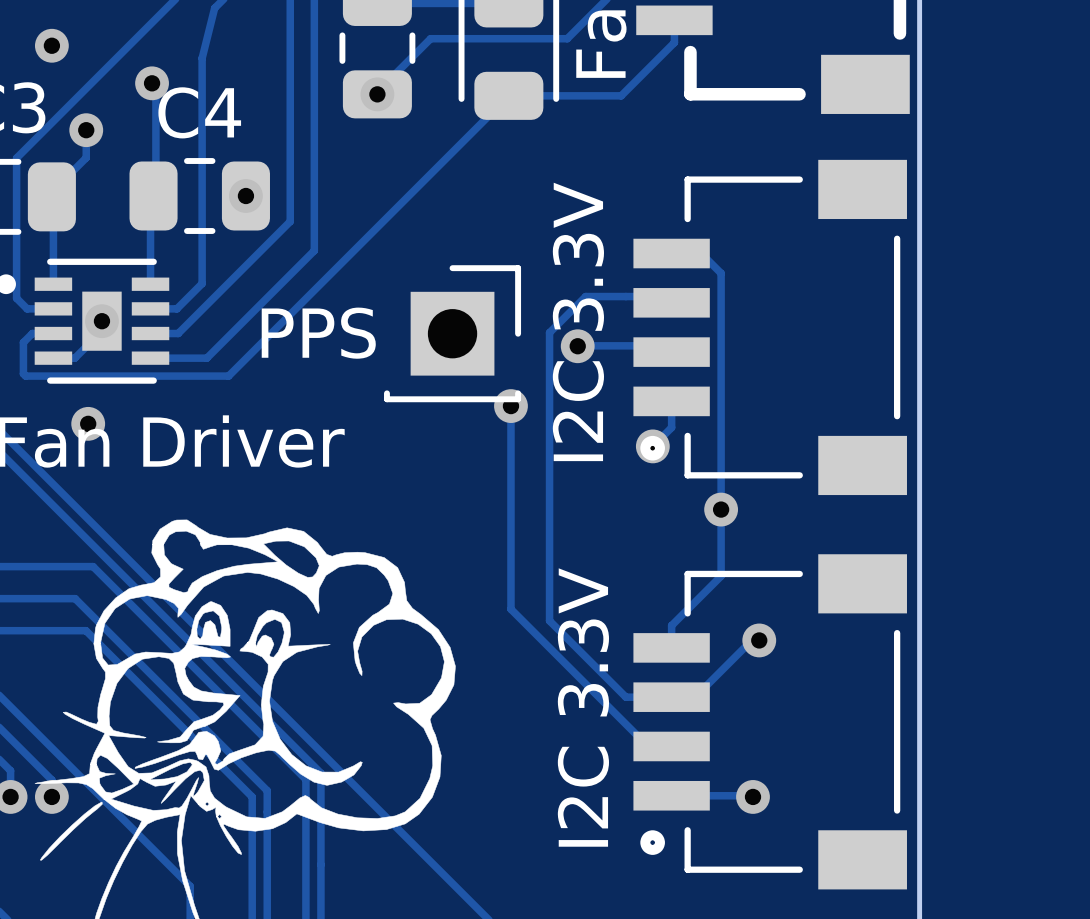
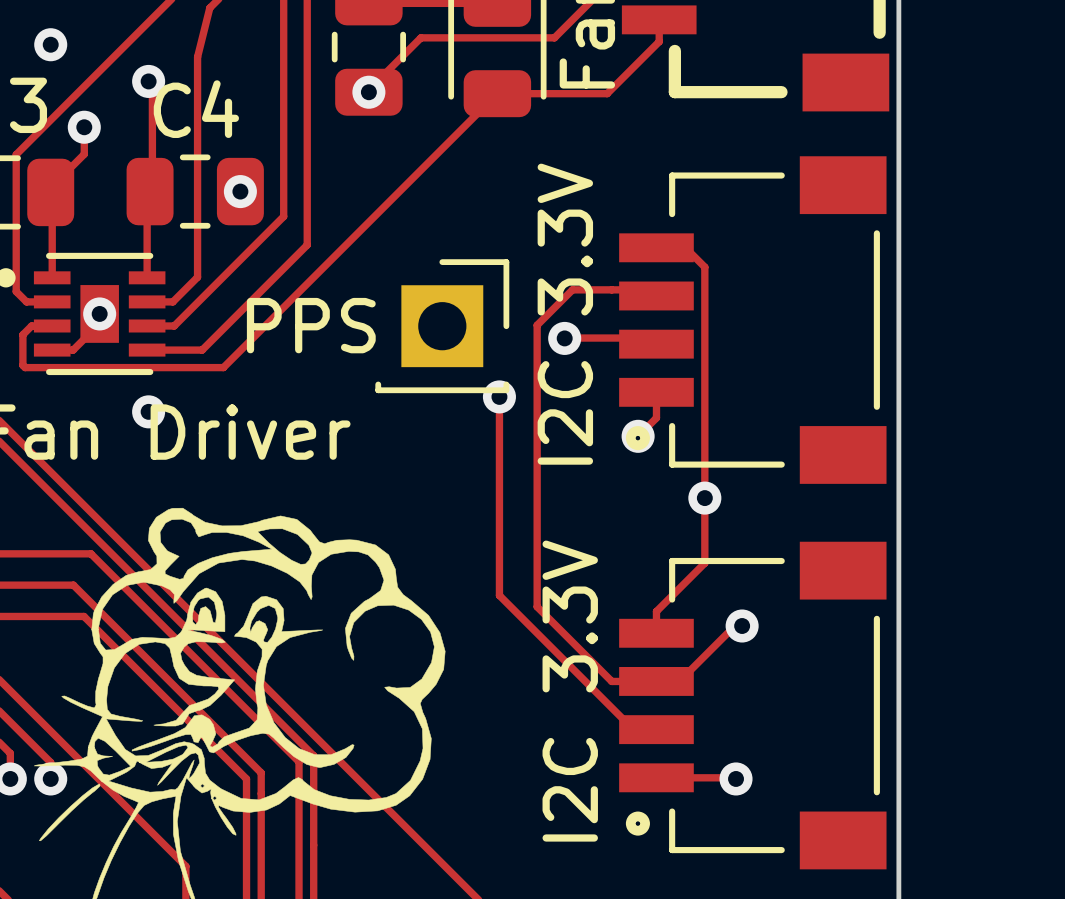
via position: (88, 423) -> (148, 411)

